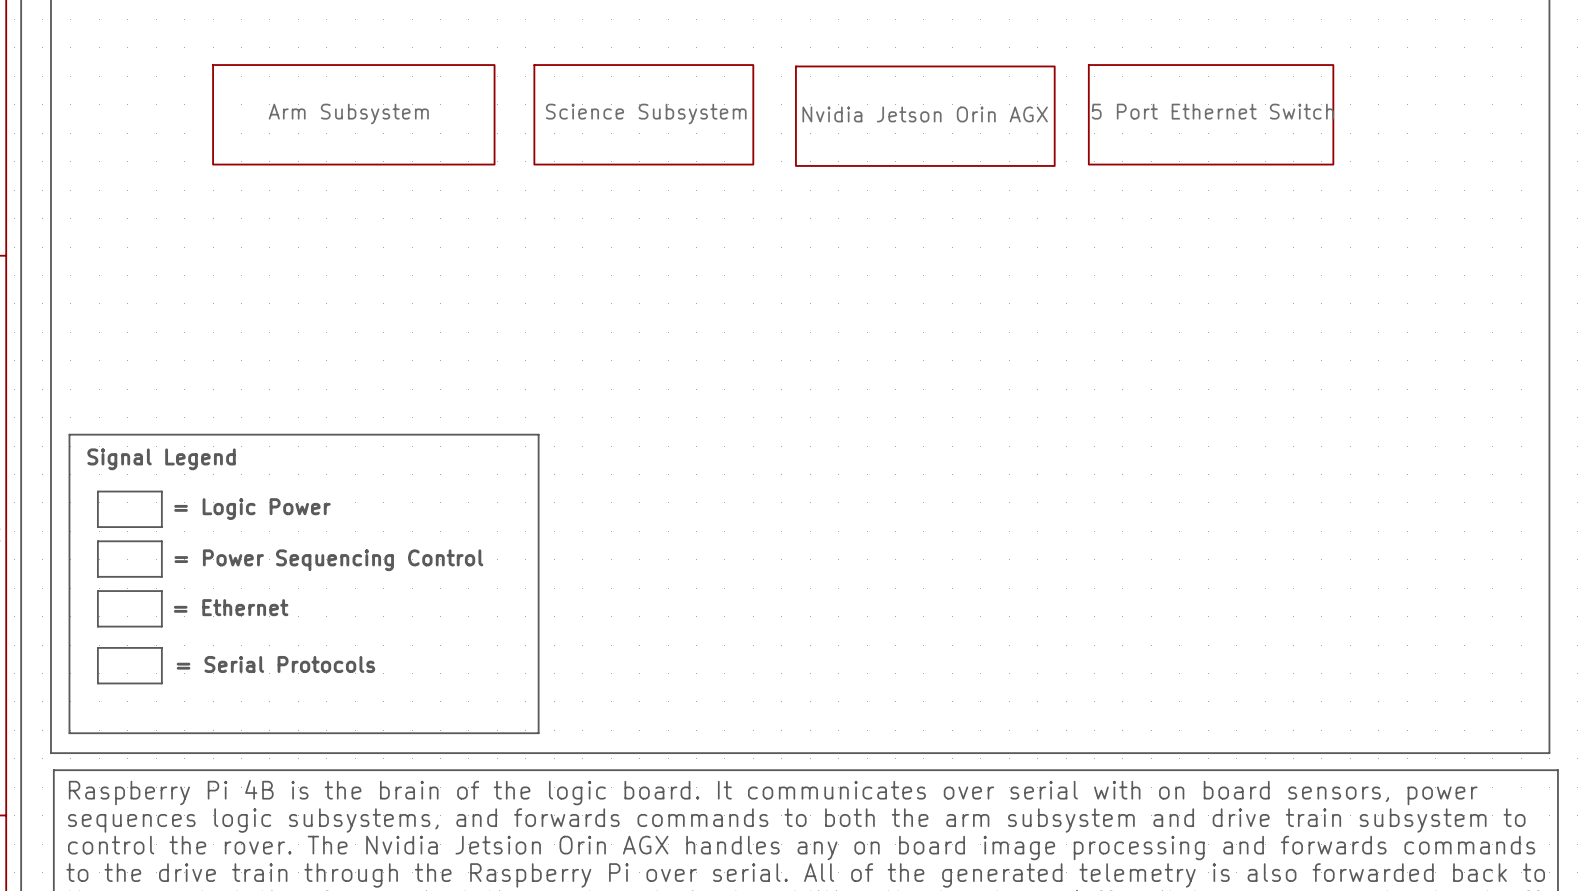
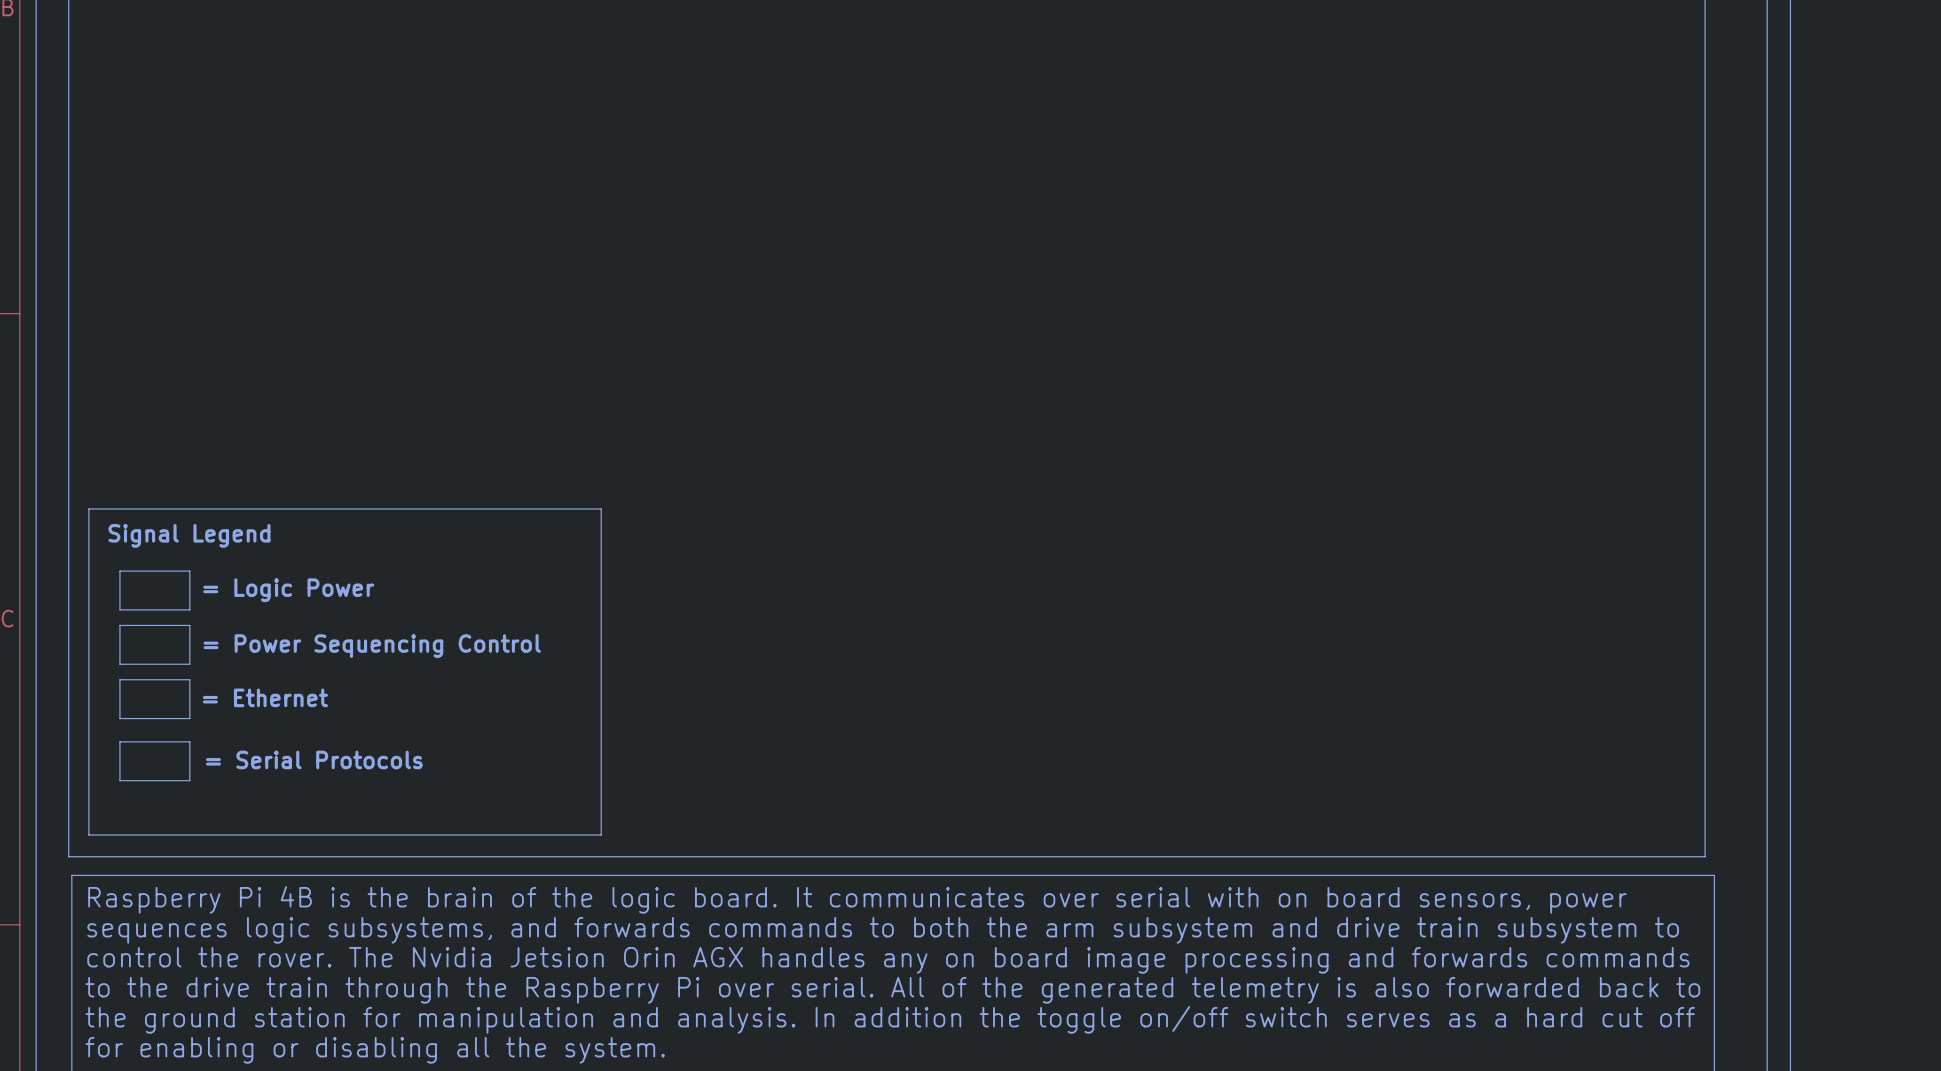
sheet Arm Subsystem: (353, 114) -> none
sheet Science Subsystem: (643, 114) -> none
sheet 5 Port Ethernet Switch: (1211, 114) -> none
sheet Nvidia Jetson Orin AGX: (925, 116) -> none

